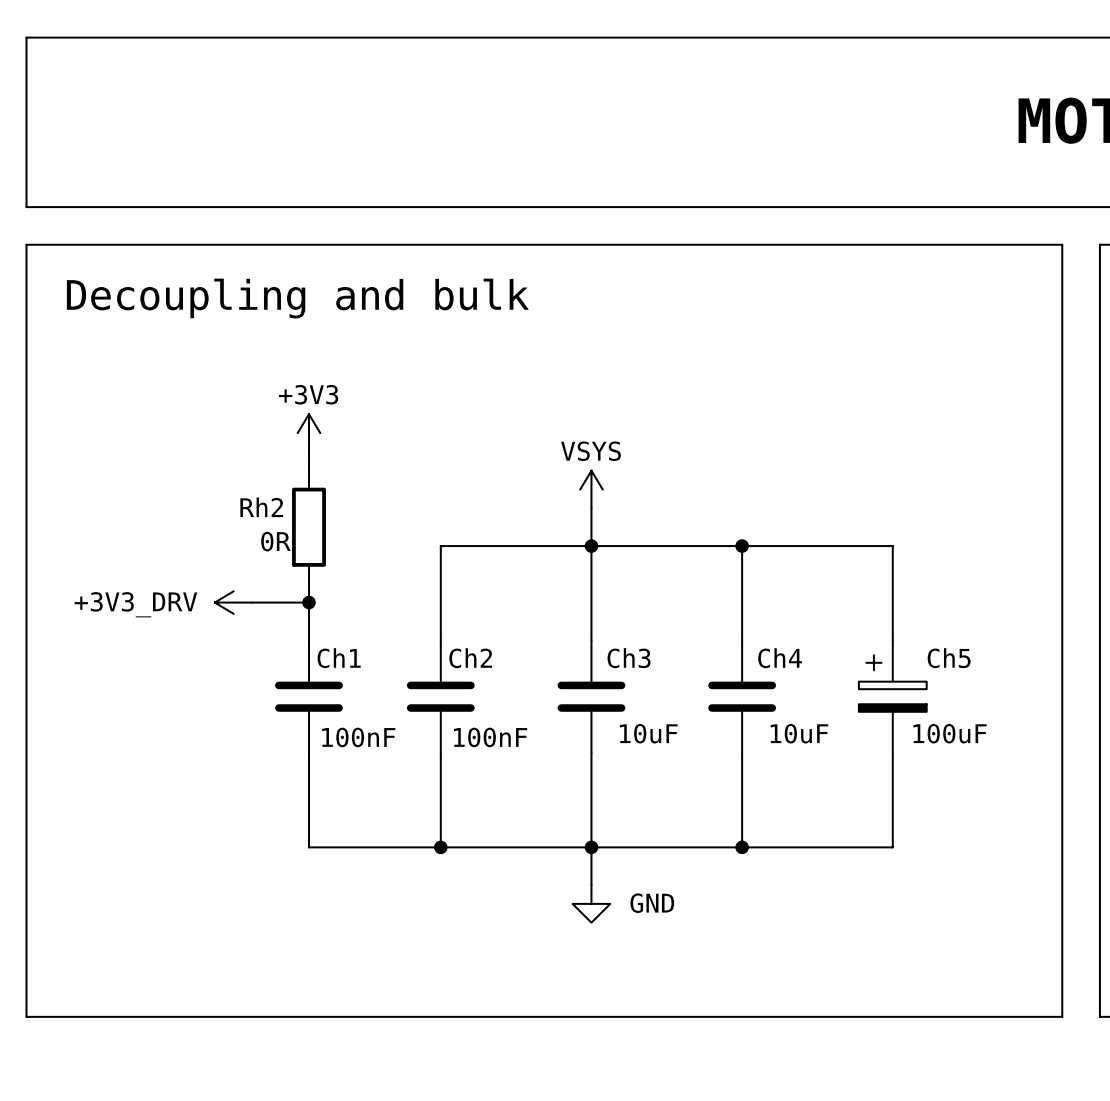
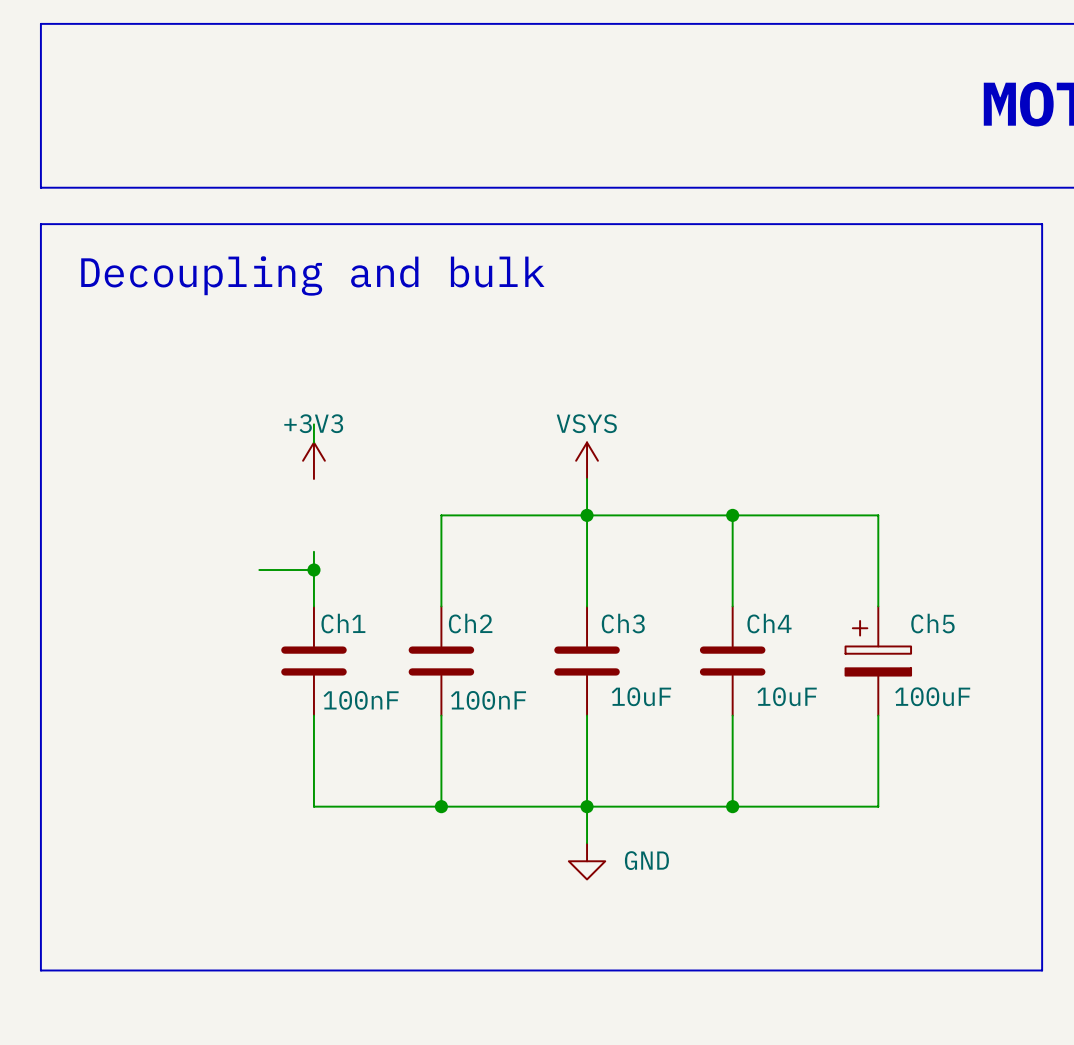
power symbol position: +3V3 (308, 433) -> +3V3 (313, 460)
Rh2: 0R (308, 527) -> none
power symbol: +3V3_DRV (233, 602) -> none

